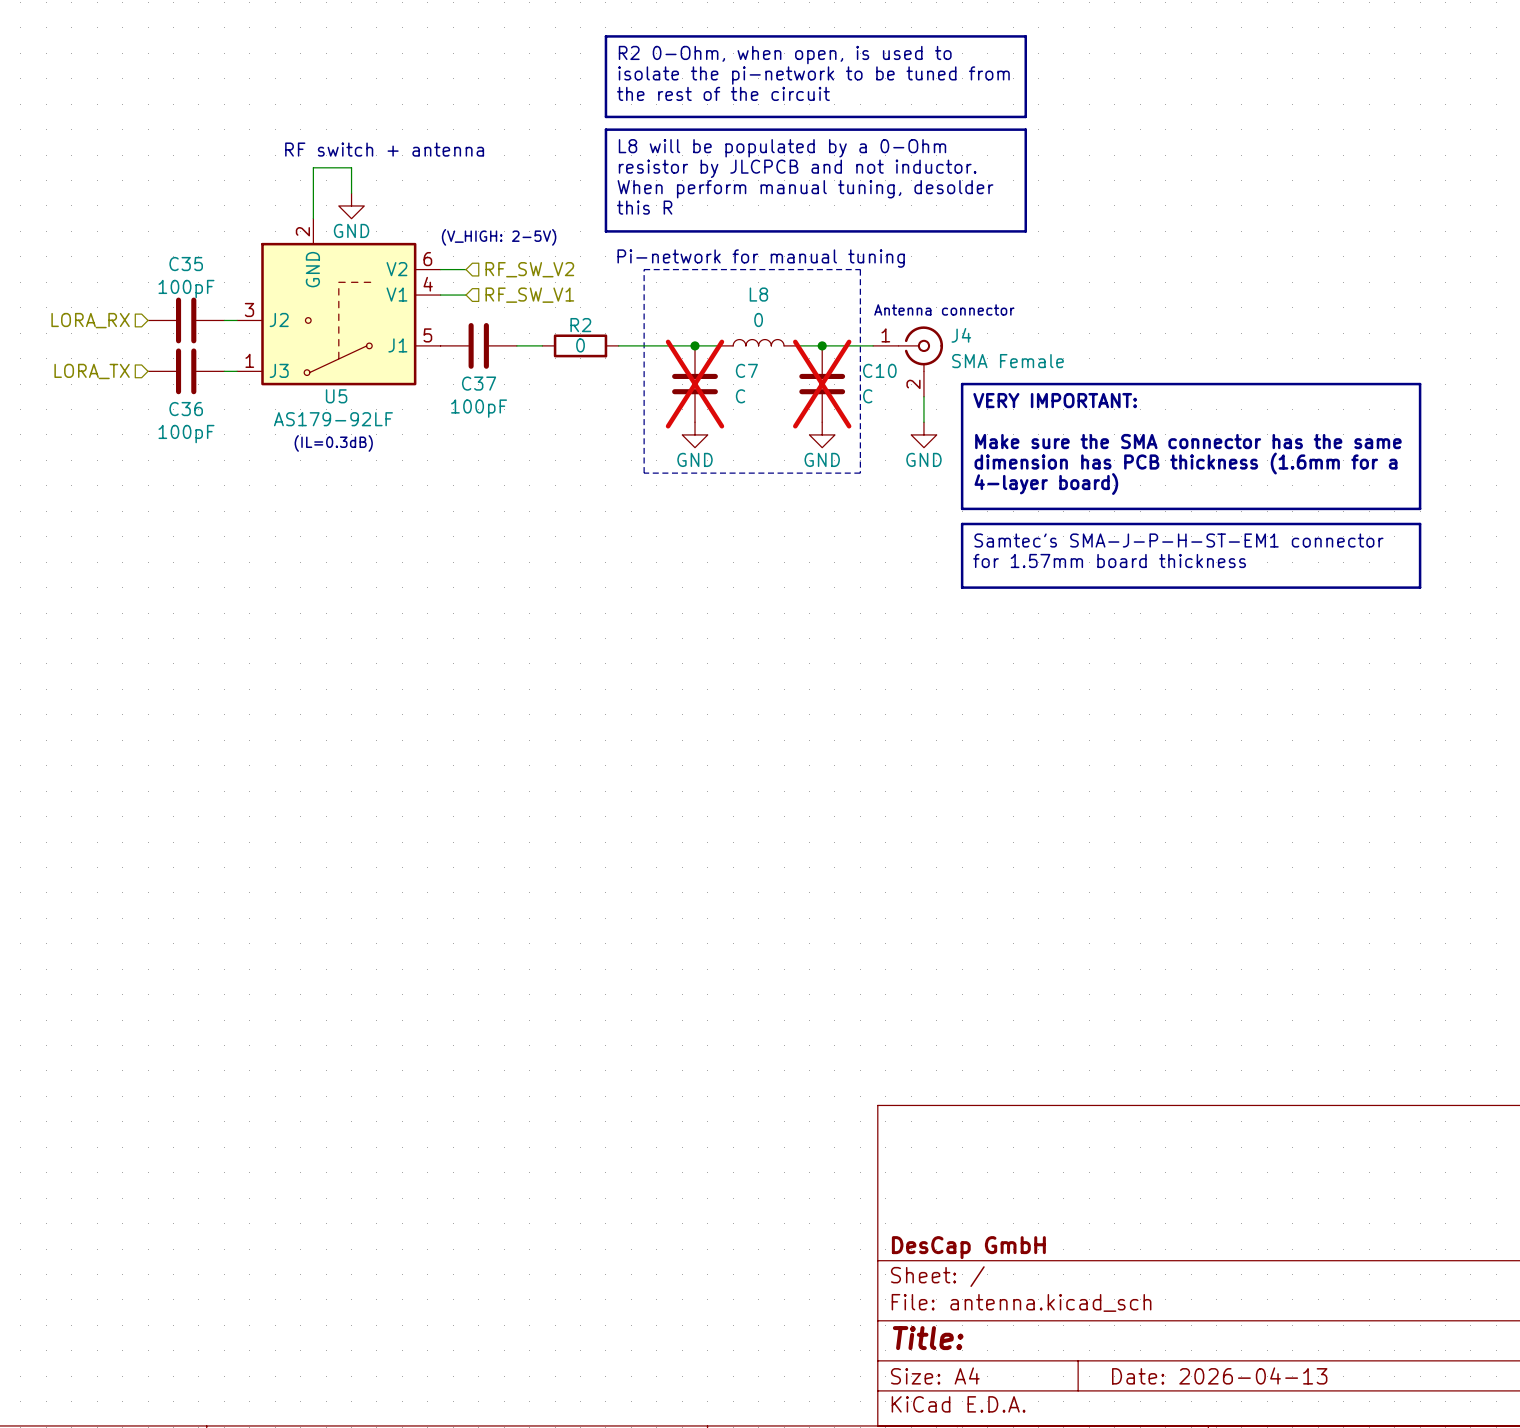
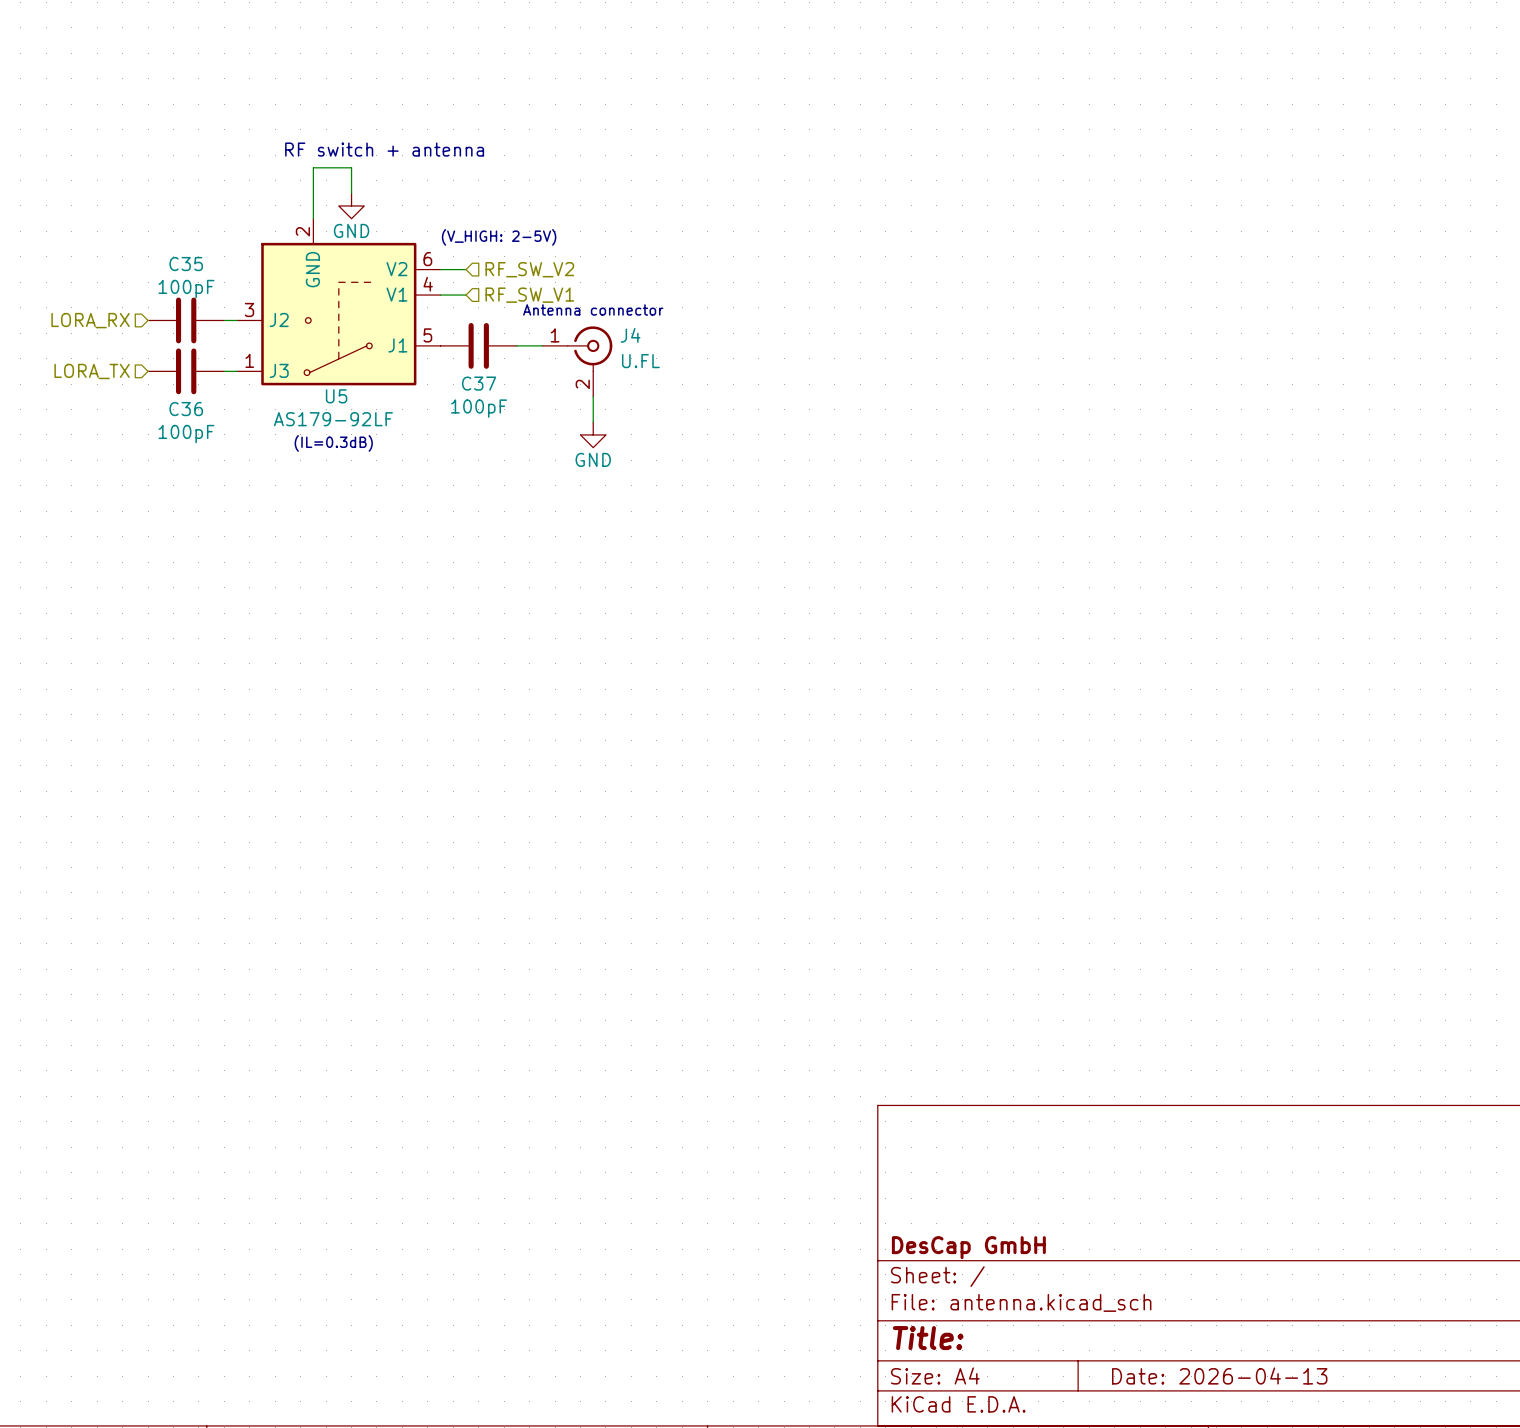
line: (605, 36) (1025, 36) (1025, 116) (605, 116) (605, 36) -> none
text: R2 0-Ohm, when open, is used to (785, 55) -> none
text: isolate the pi-network to be tuned from (813, 75) -> none
text: the rest of the circuit (723, 93) -> none
line: (605, 129) (605, 231) (1025, 231) (1025, 129) (605, 129) -> none
text: L8 will be populated by a 0-Ohm (782, 148) -> none
text: resistor by JLCPCB and not inductor. (797, 168) -> none
text: When perform manual tuning, desolder (805, 189) -> none
text: this R (644, 207) -> none
text: Pi-network for manual tuning (761, 258) -> none
line: (644, 269) (860, 269) (860, 473) (644, 473) (644, 269) -> none
text: none -> Antenna connector (593, 309)
text: Antenna connector (944, 309) -> none
L8: 0 (758, 342) -> none
R2: 0 (580, 345) -> none
wire: (618, 345) (720, 345) -> none
junction: (695, 345) -> none
wire: (796, 345) (873, 345) -> none
junction: (822, 345) -> none
J4 position: (908, 361) -> (577, 361)
J4 value: SMA Female (1007, 361) -> U.FL (640, 361)
C7: C (695, 384) -> none
C10: C (822, 384) -> none
line: (962, 384) (962, 508) (1420, 508) (1420, 384) (962, 384) -> none
wire: none -> (593, 396) (593, 422)
wire: (923, 396) (923, 422) -> none
text: VERY IMPORTANT: (1055, 400) -> none
power symbol position: GND (695, 434) -> GND (593, 434)
power symbol: GND (822, 434) -> none
power symbol: GND (923, 434) -> none
text: Make sure the SMA connector has the same (1188, 441) -> none
text: dimension has PCB thickness (1.6mm for a (1185, 463) -> none
text: 4-layer board) (1046, 484) -> none
line: (962, 524) (1420, 524) (1420, 587) (962, 587) (962, 524) -> none
text: Samtec's SMA-J-P-H-ST-EM1 connector (1178, 540) -> none
text: for 1.57mm board thickness (1109, 560) -> none

